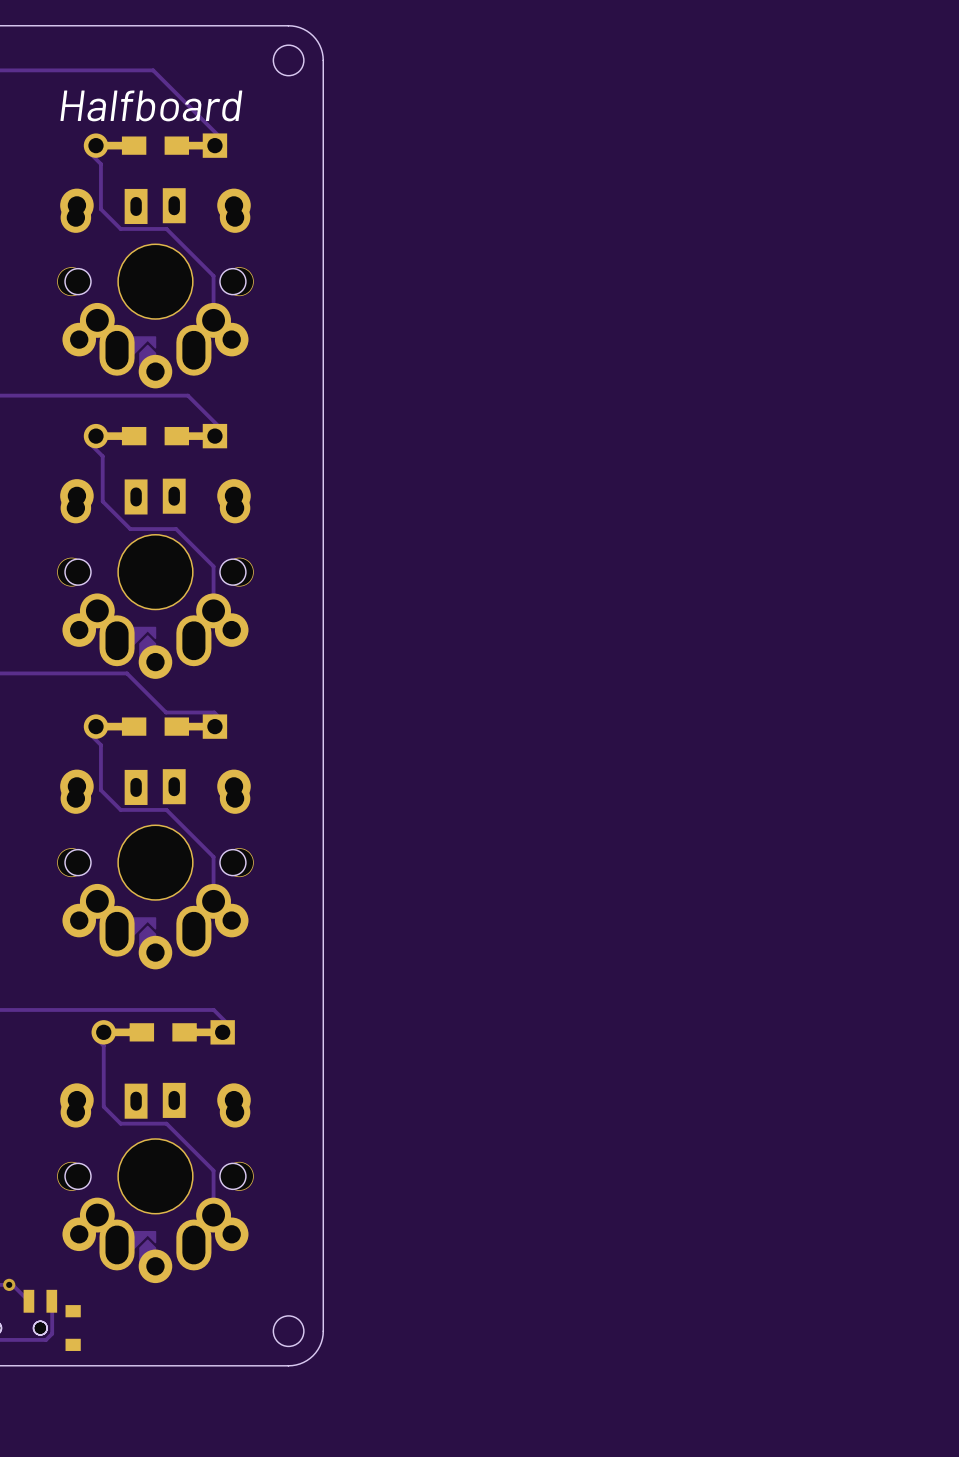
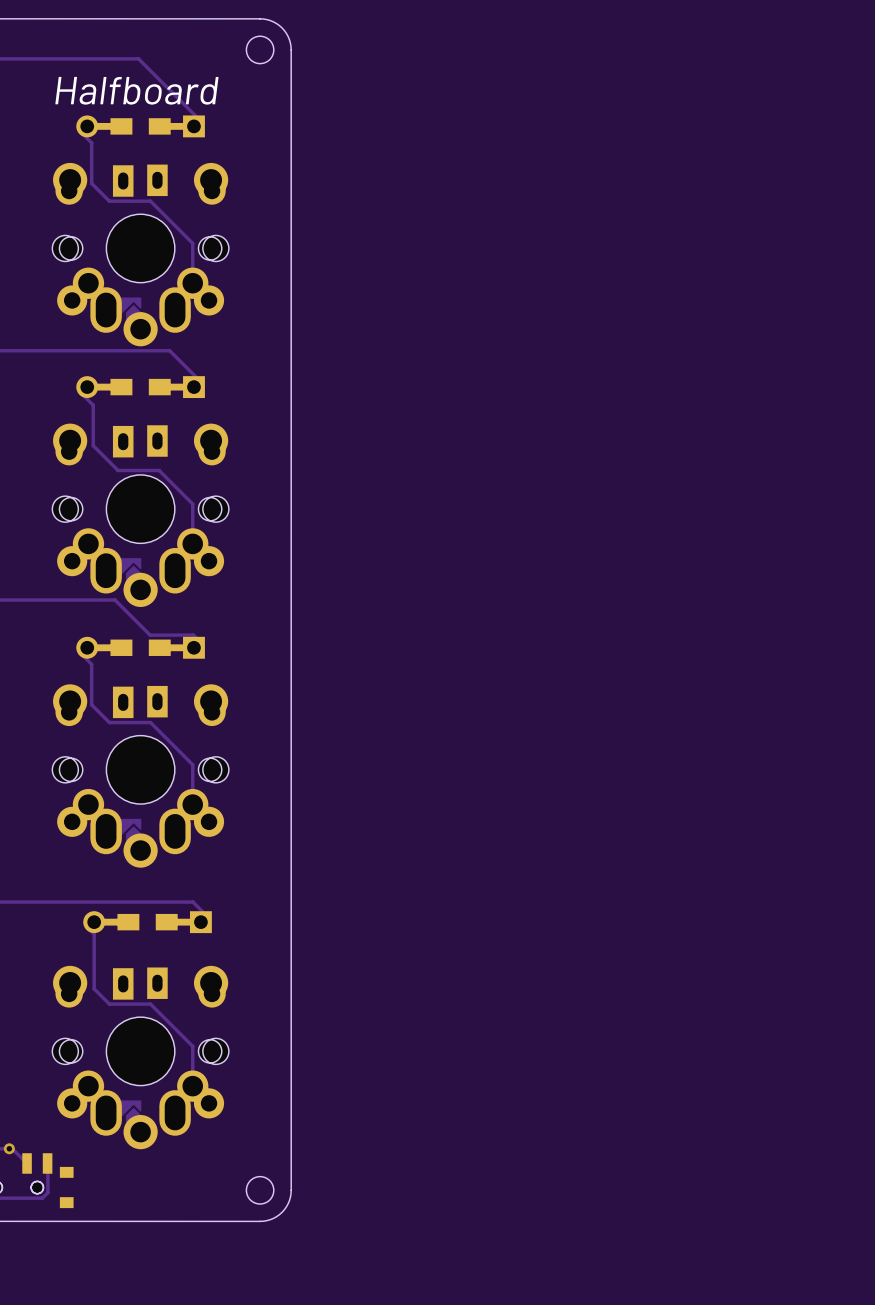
part footprint: [57, 188, 254, 389] -> [52, 162, 229, 347]
part footprint: [57, 478, 254, 679] -> [52, 423, 229, 607]
part footprint: [57, 769, 254, 970] -> [52, 684, 229, 868]
part footprint: [57, 1082, 254, 1284] -> [52, 965, 229, 1150]

